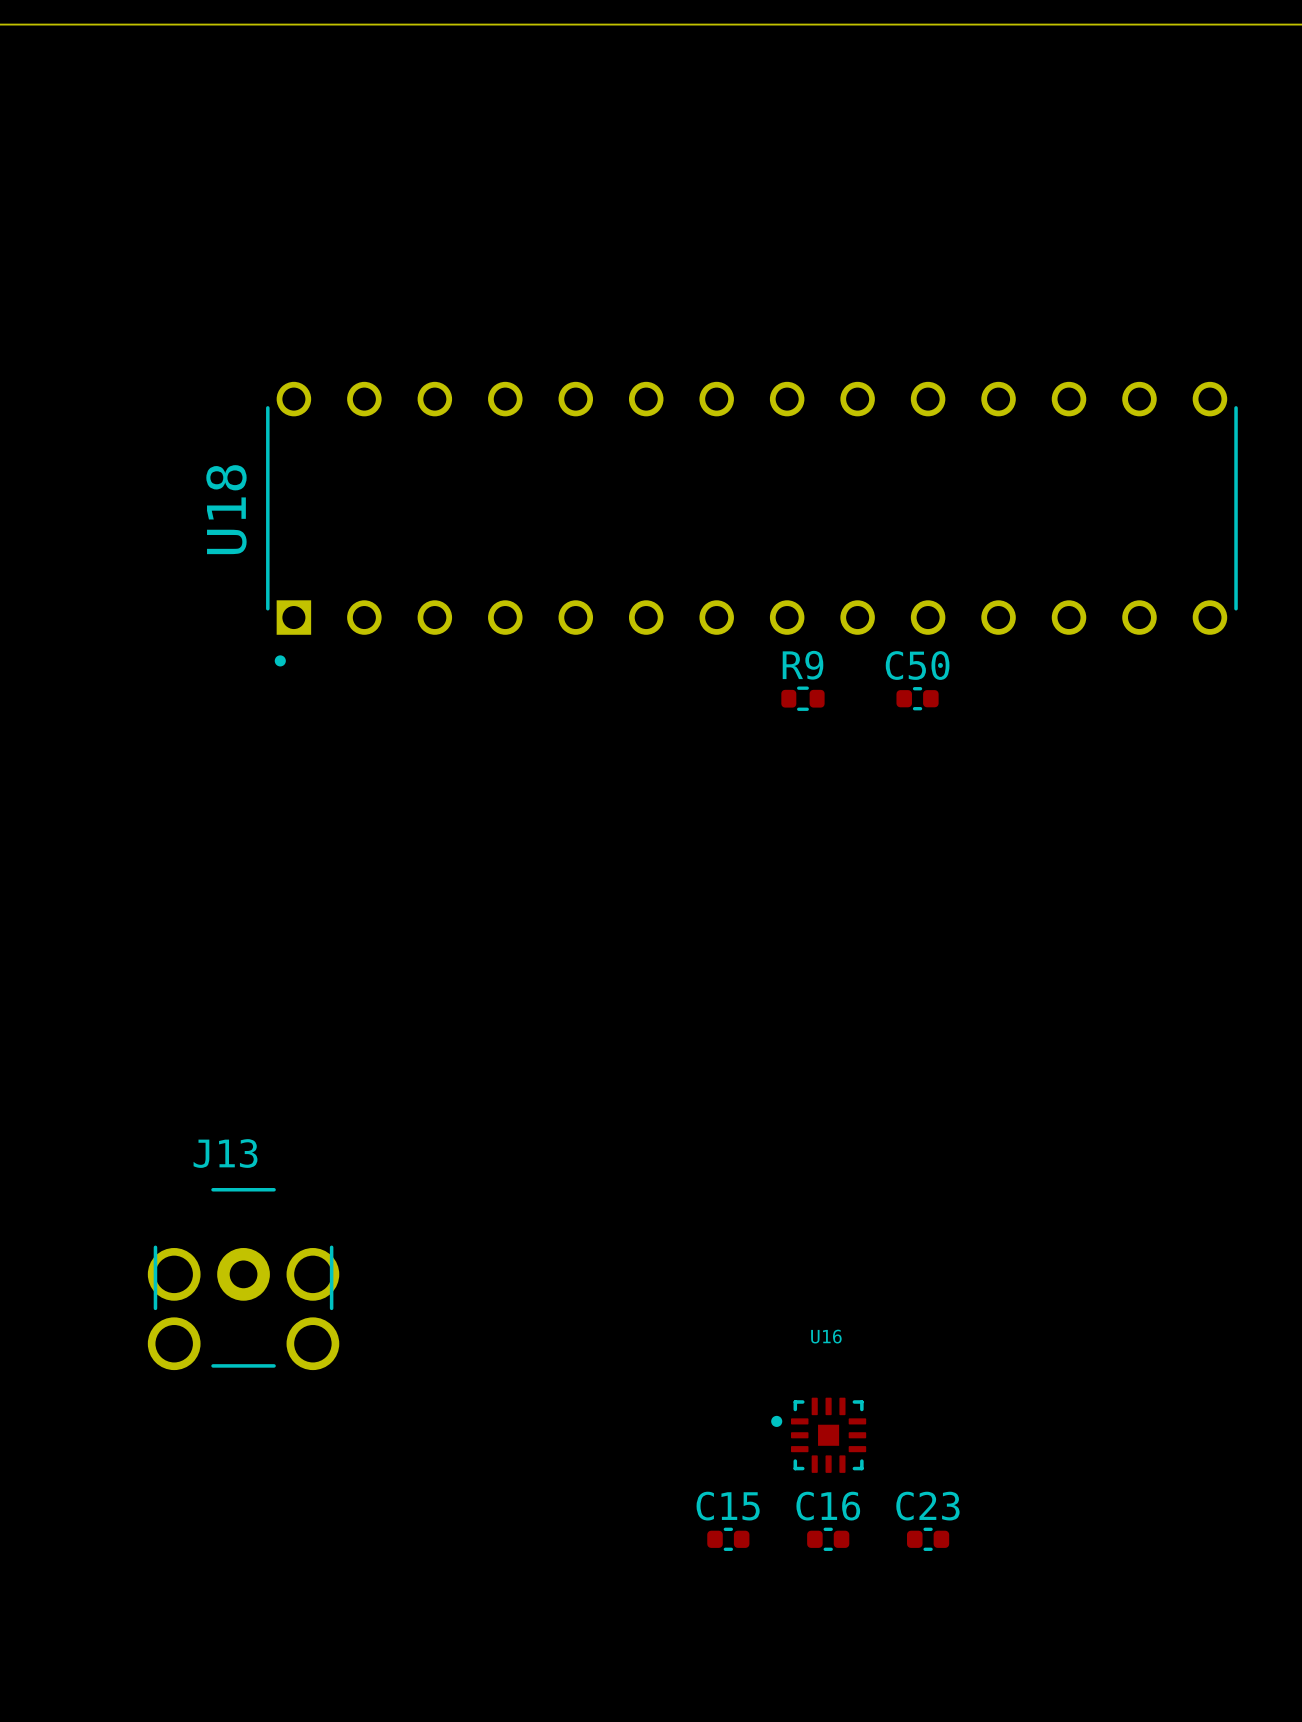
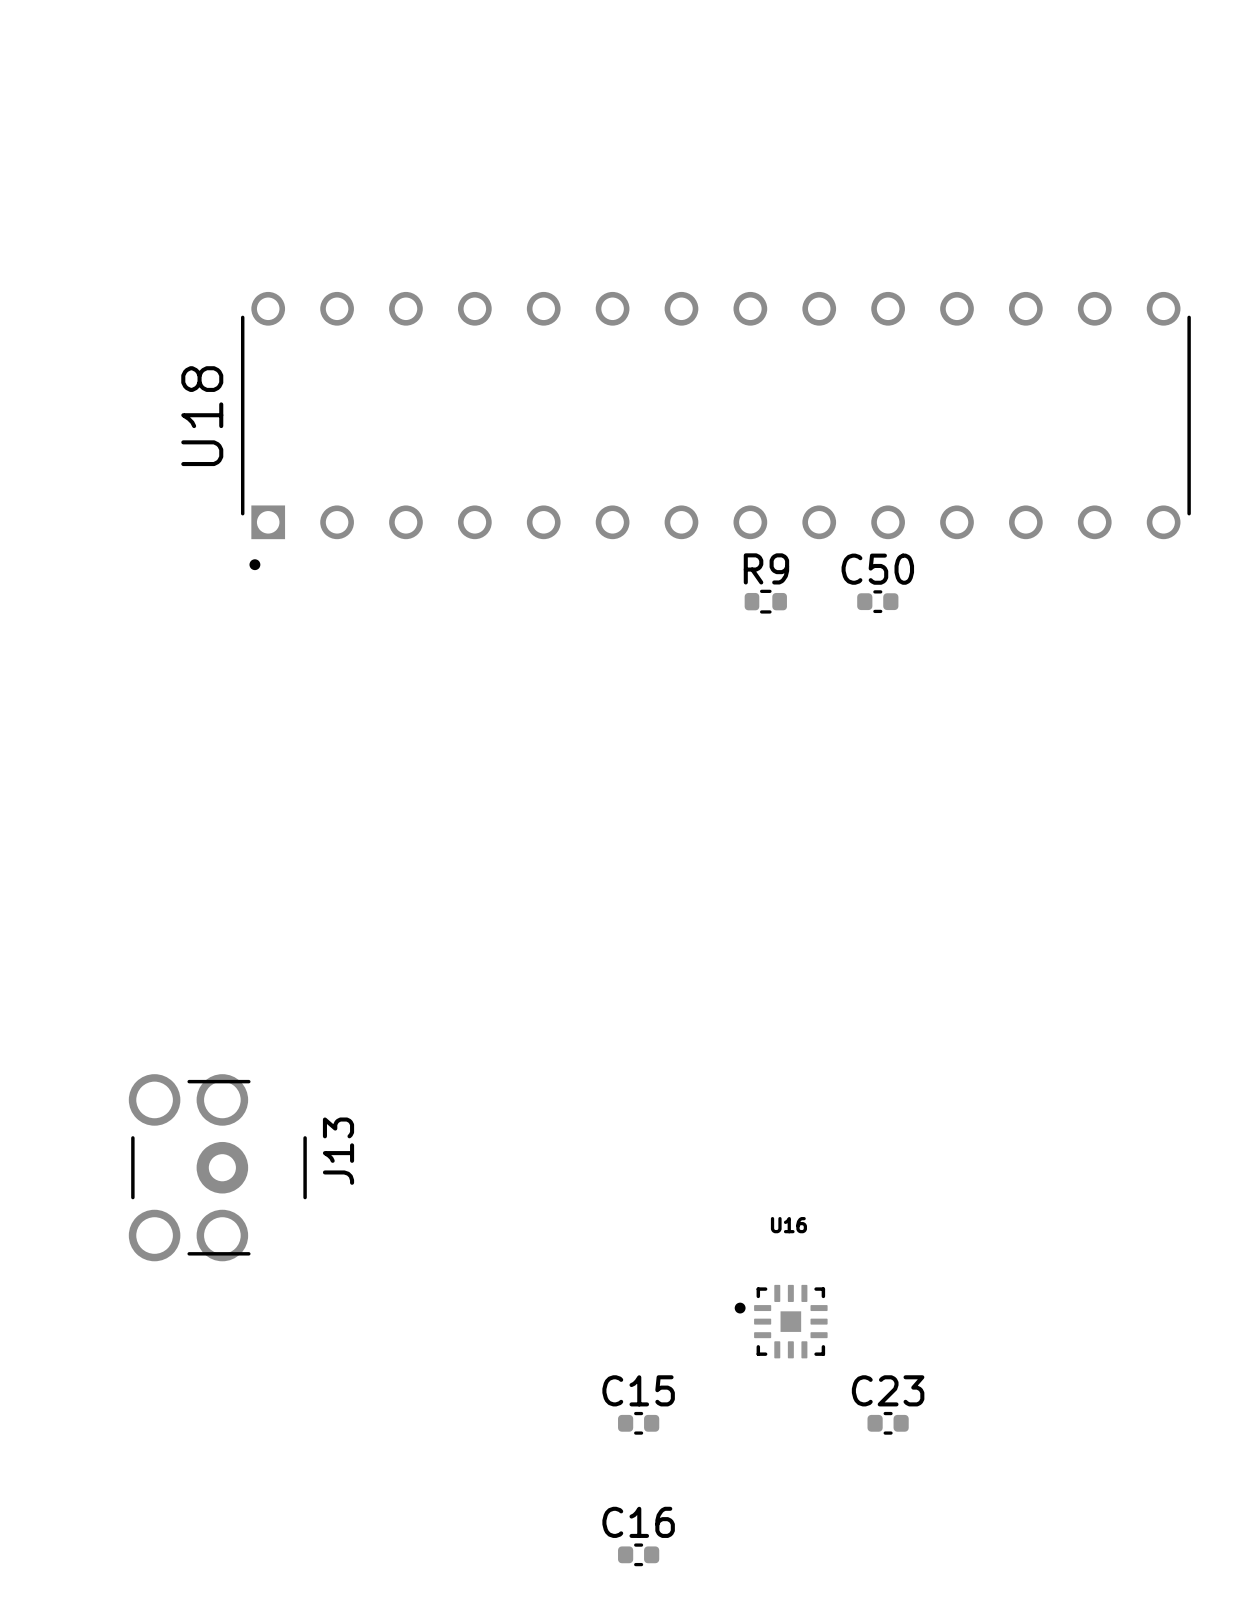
J13 rotation: 0° (243, 1279) -> 90° clockwise (217, 1167)
C15 position: (728, 1539) -> (638, 1423)
C16 position: (828, 1539) -> (638, 1554)

